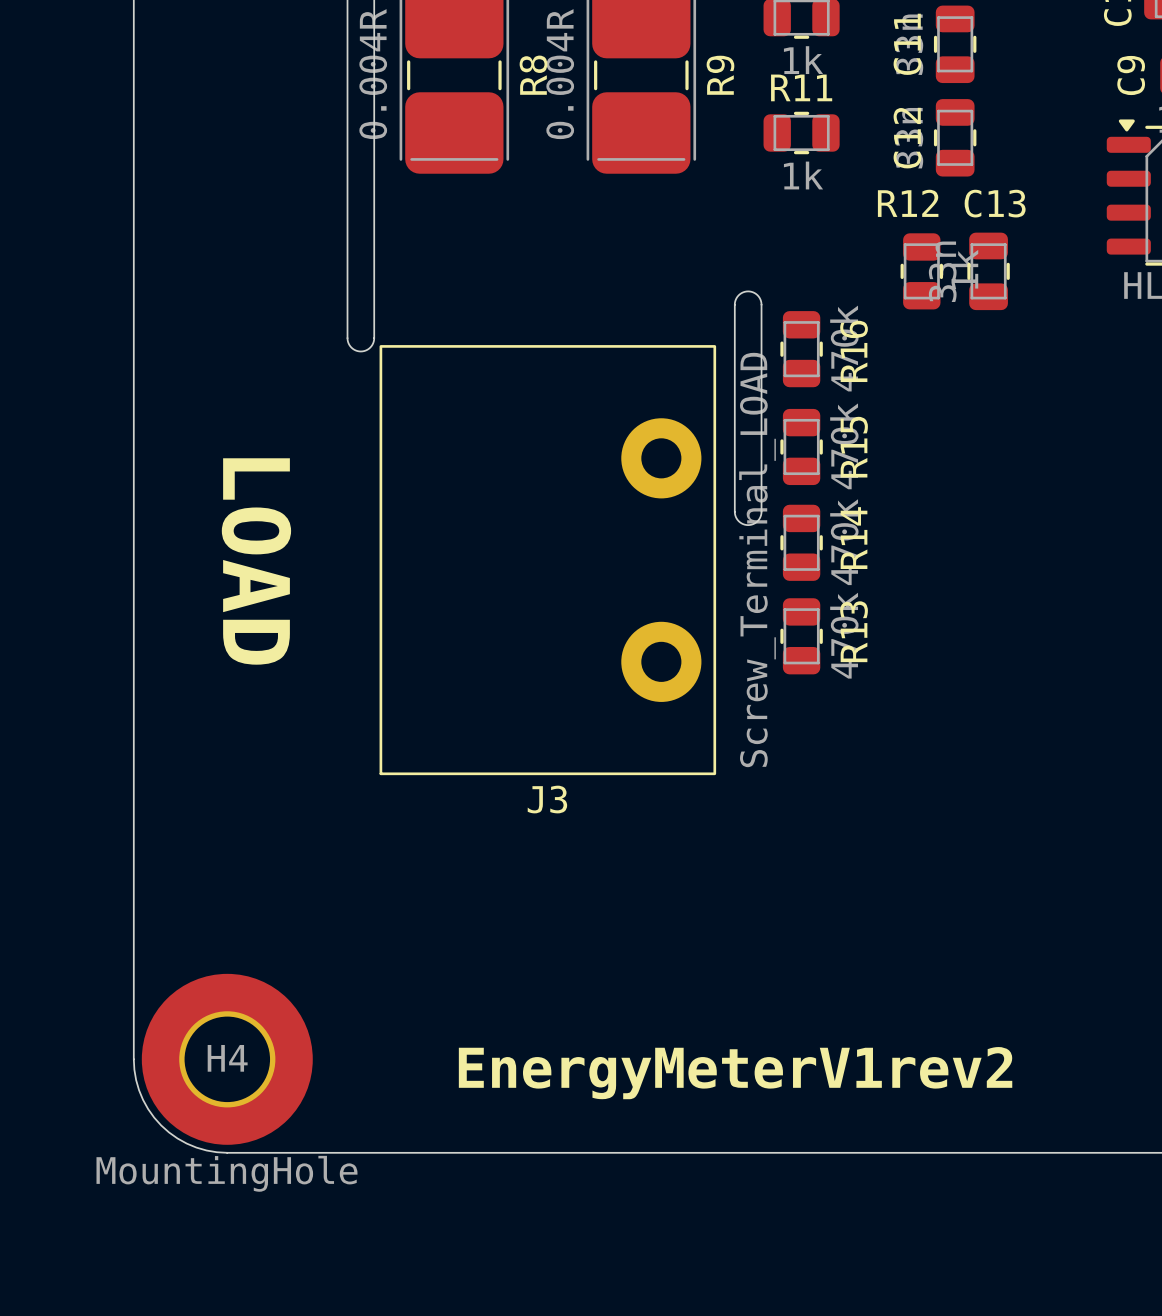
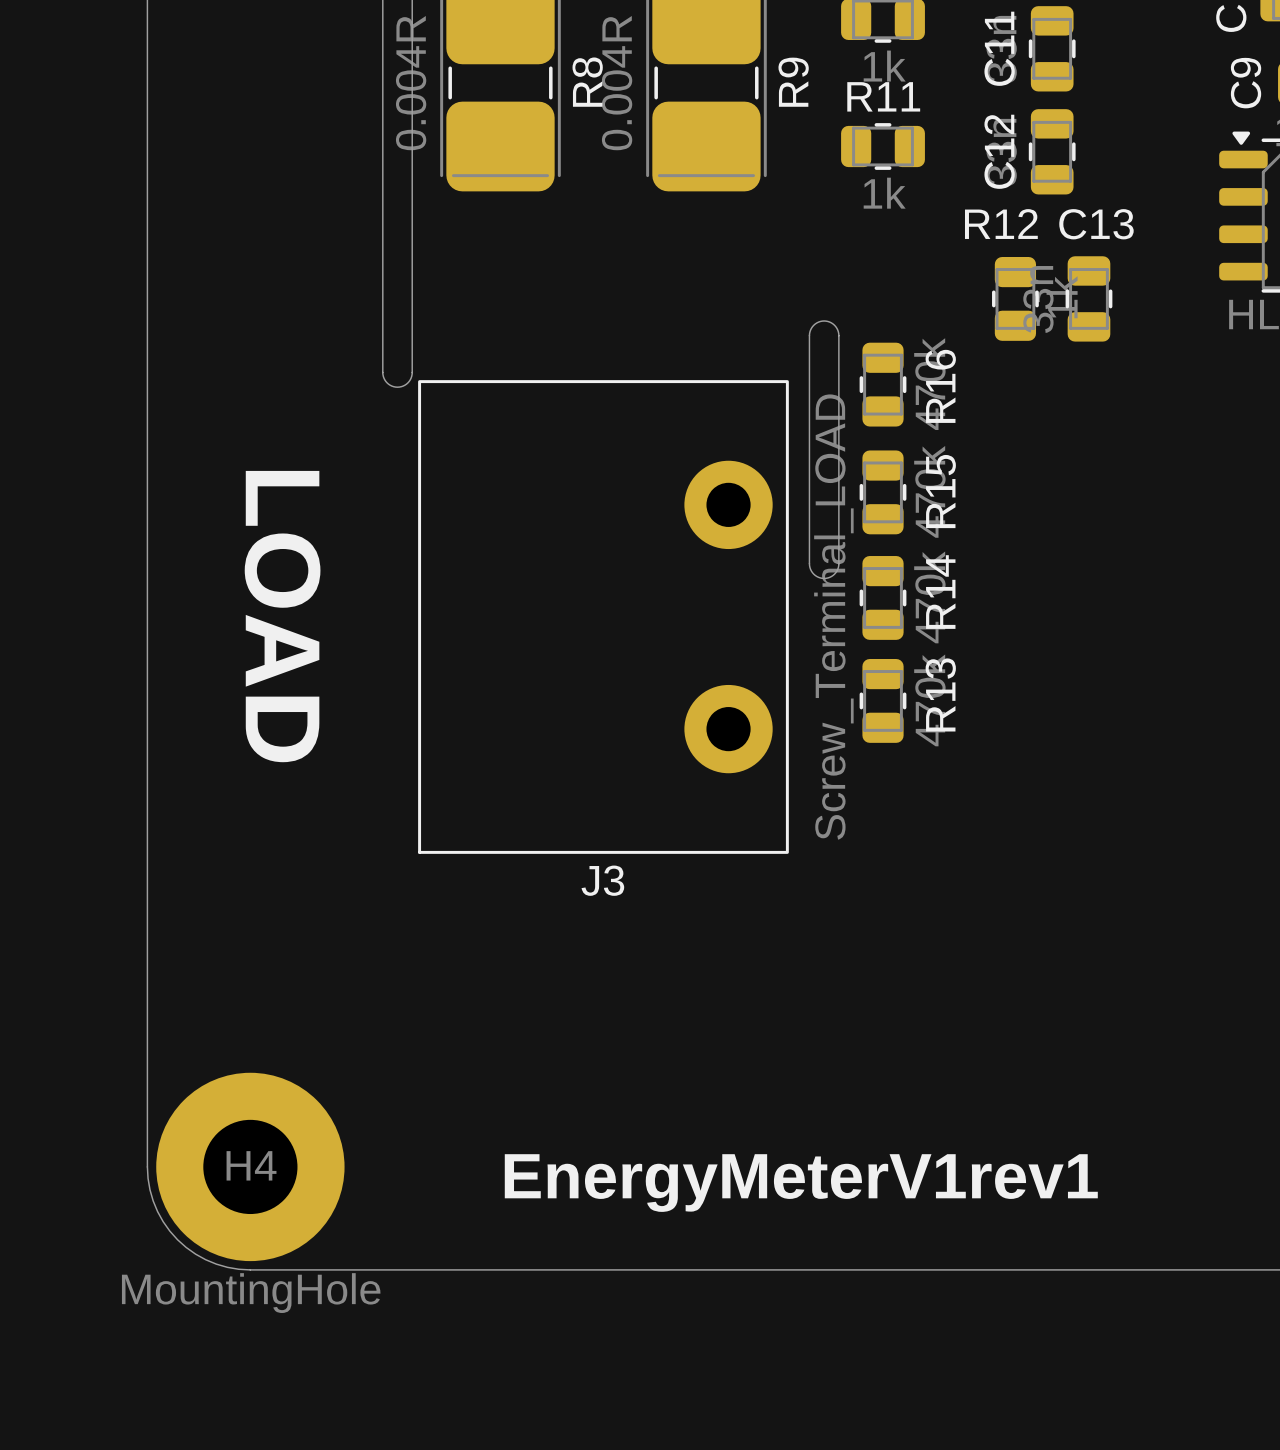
text: EnergyMeterV1rev2 (735, 1073) -> EnergyMeterV1rev1 (801, 1183)

